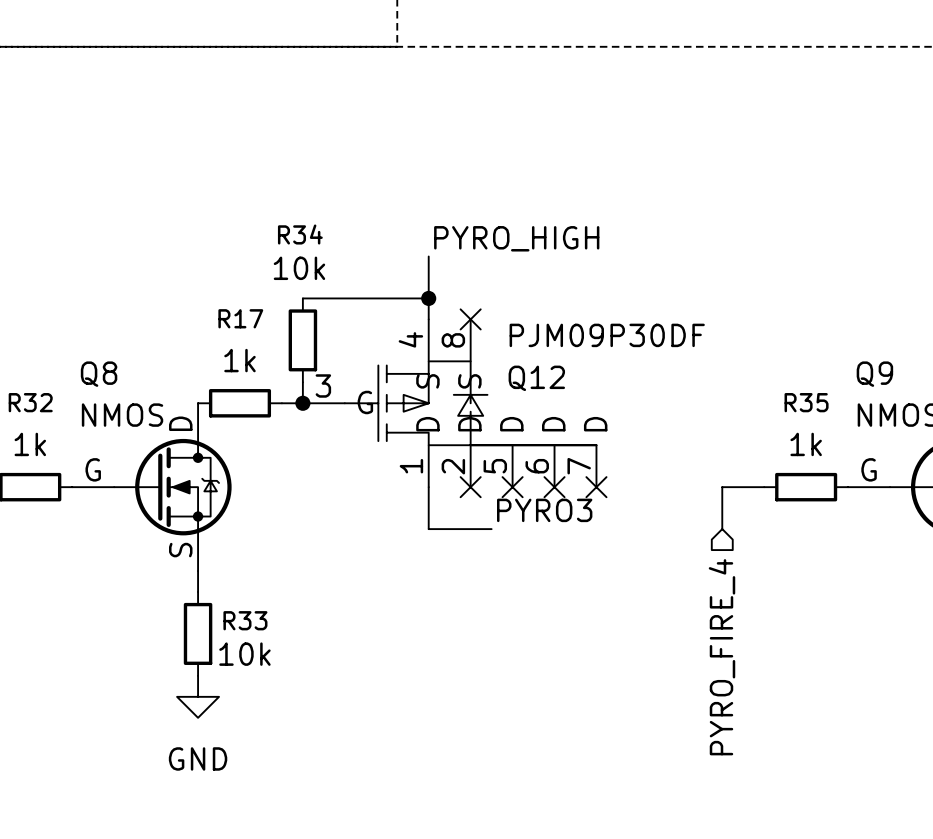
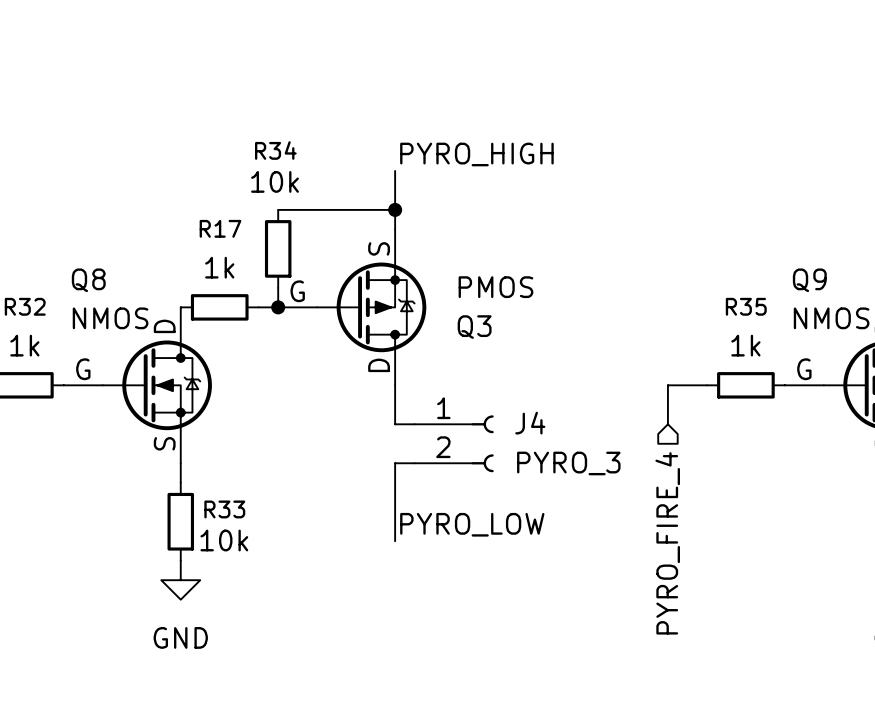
no-connect mark: (470, 319) -> none
Q3: none -> PMOS (352, 307)
Q12: PJM09P30DF (449, 403) -> none
no-connect mark: (470, 487) -> none
no-connect mark: (512, 487) -> none
no-connect mark: (554, 487) -> none
no-connect mark: (596, 487) -> none
label: PYRO3 (544, 510) -> none
J4: none -> PYRO_3 (454, 443)
wire: none -> (414, 463) (395, 463) (395, 541)
label: none -> PYRO_LOW (472, 524)

